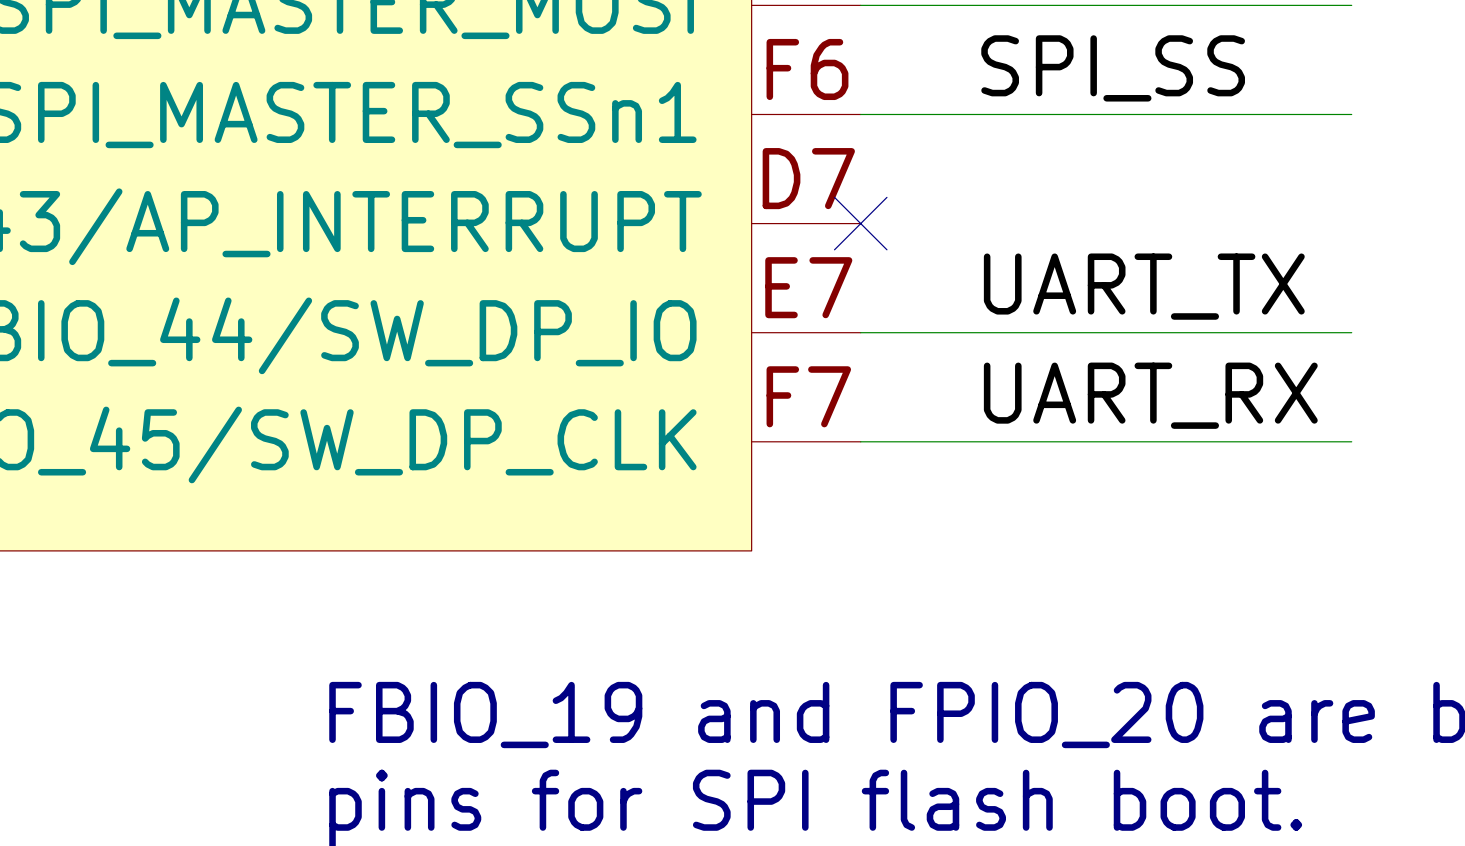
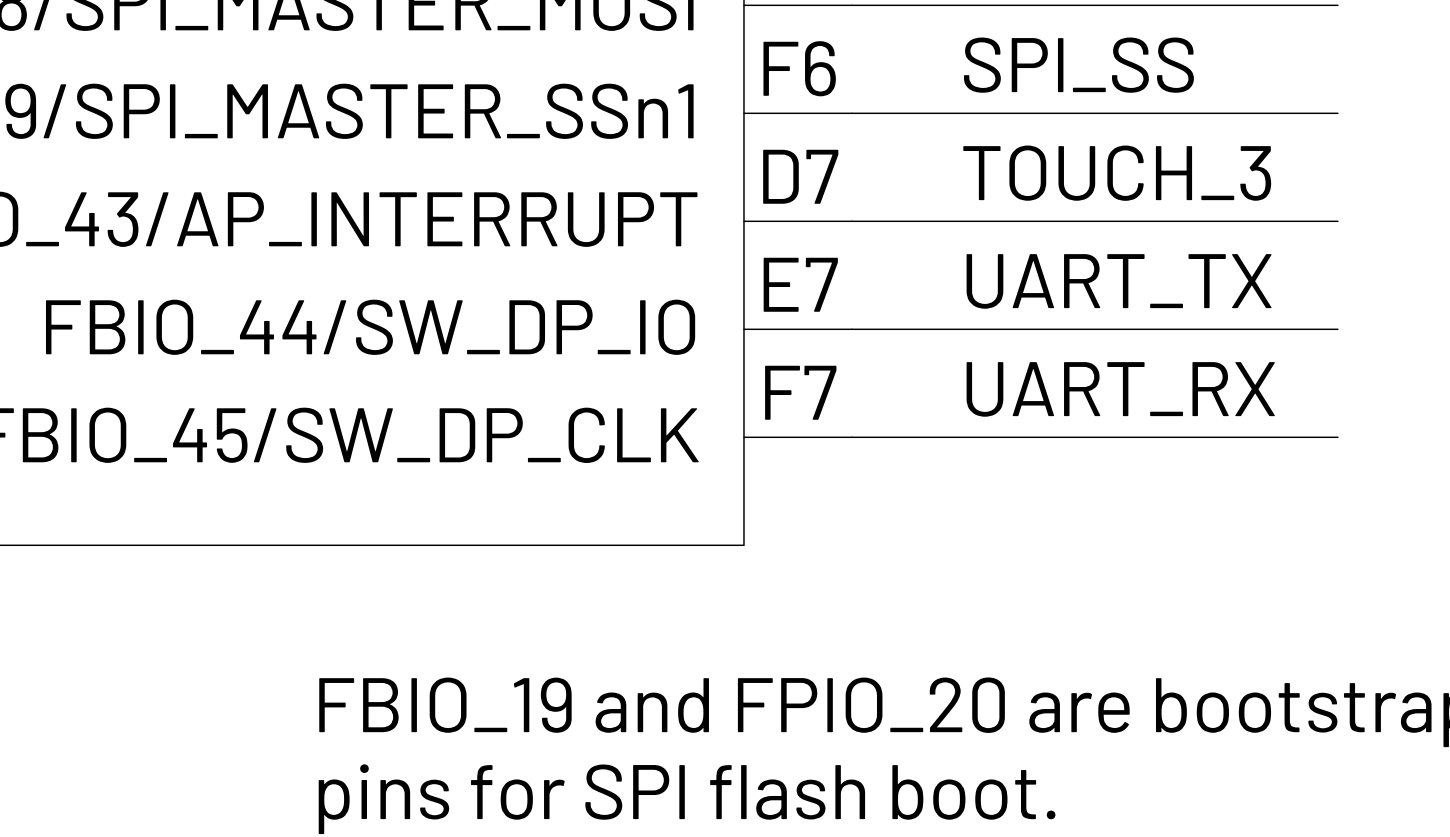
label: none -> TOUCH_3 (1117, 173)
wire: none -> (851, 221) (1337, 221)
no-connect mark: (860, 223) -> none

